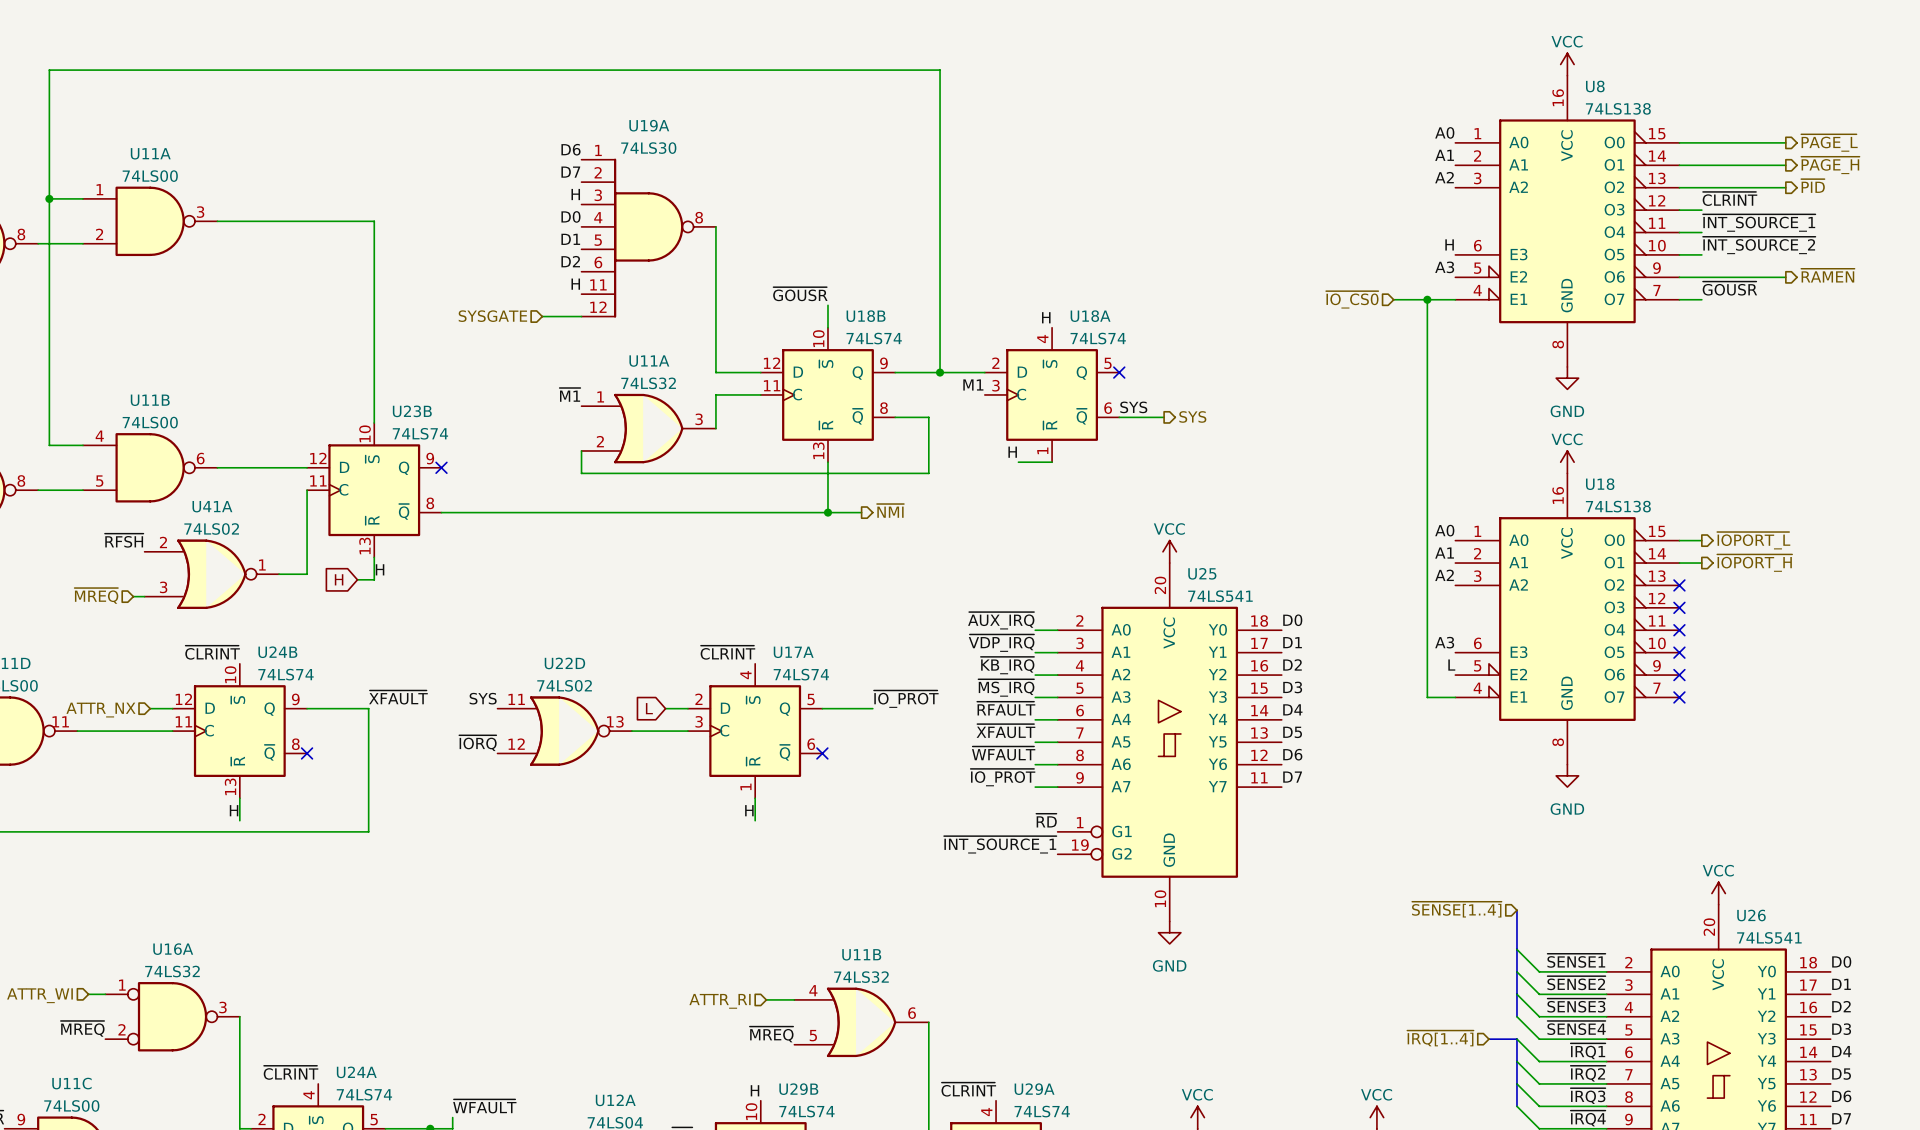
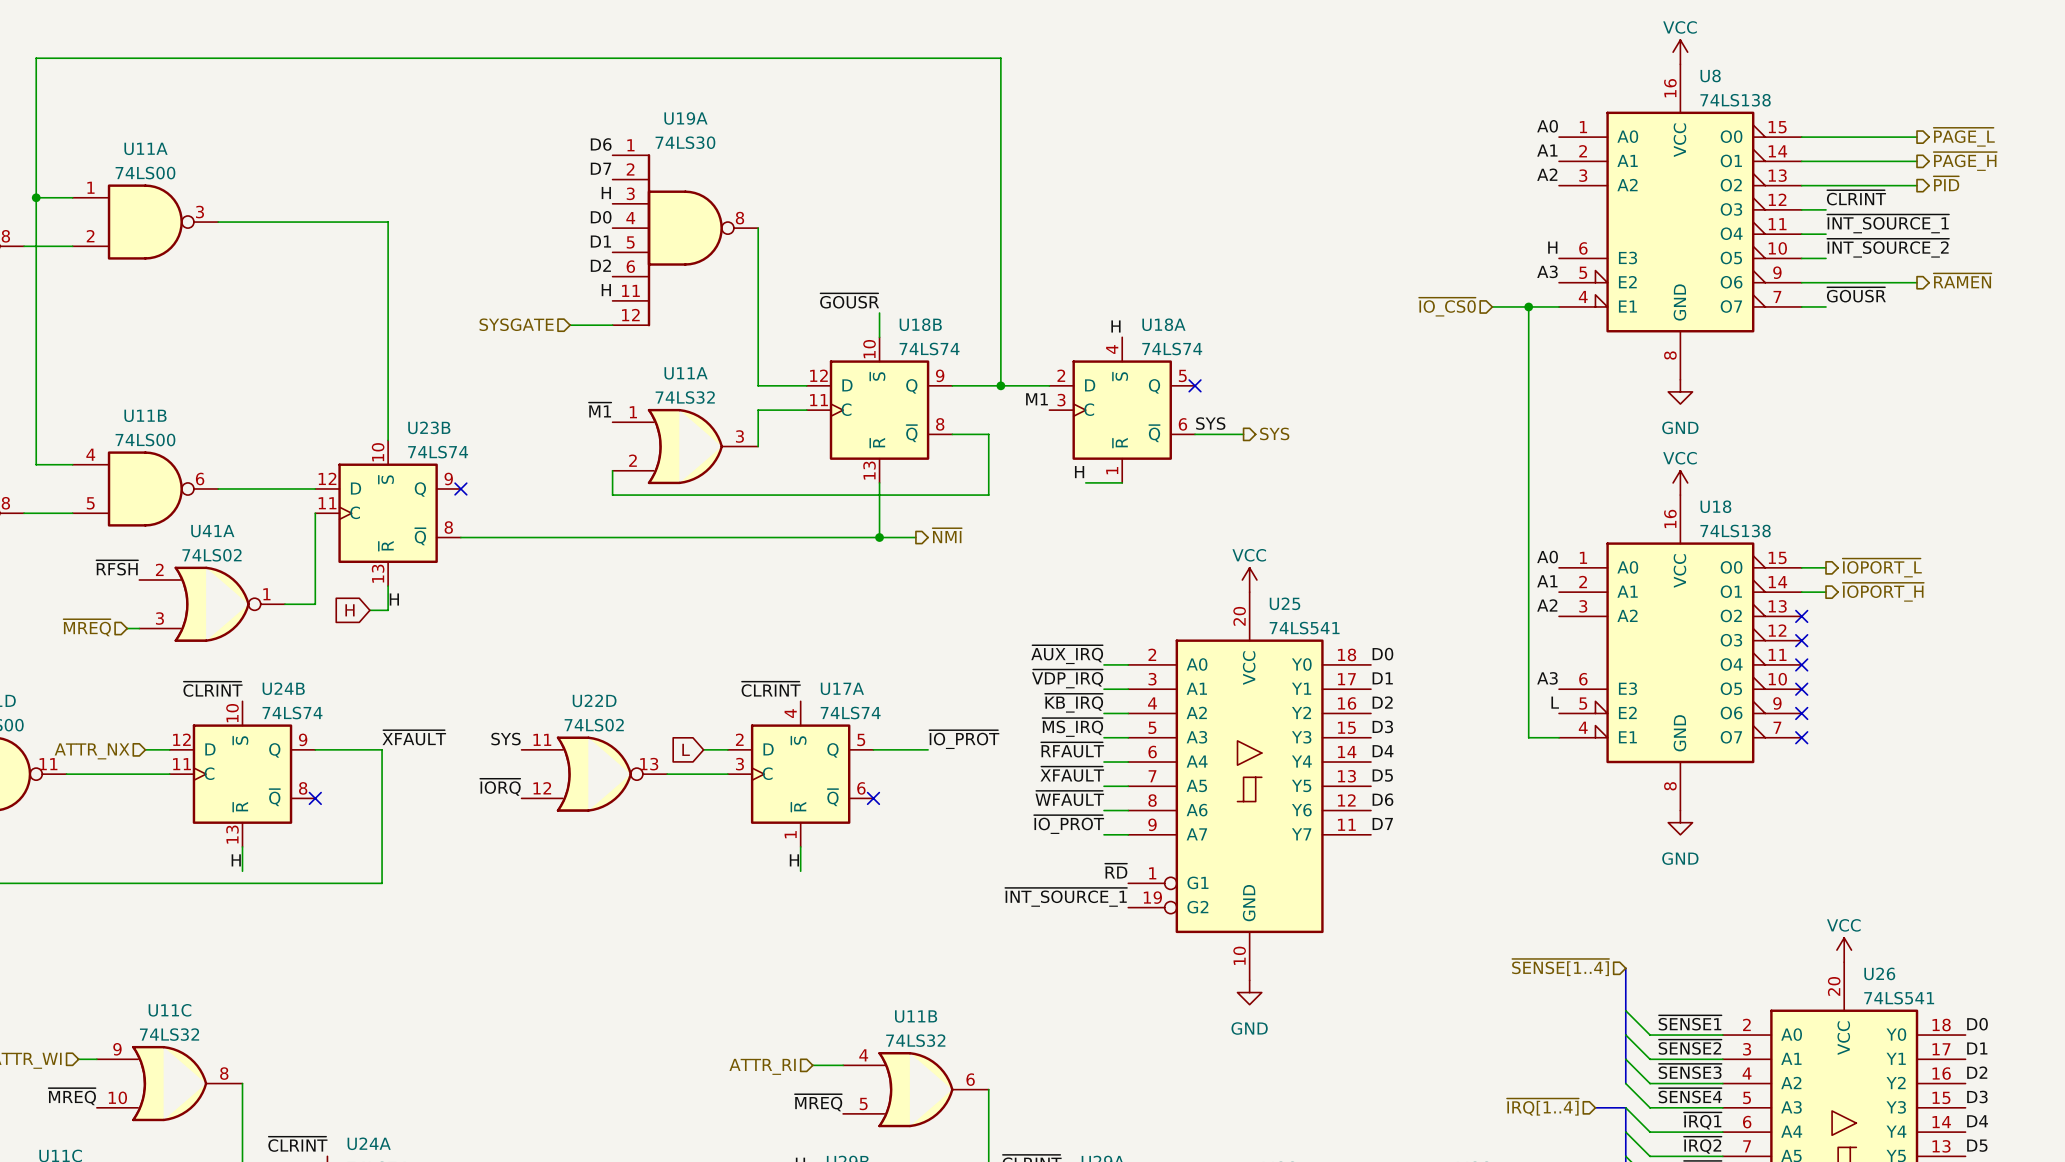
U16A: 74LS32 (172, 1016) -> none
U11C: none -> 74LS32 (169, 1083)

